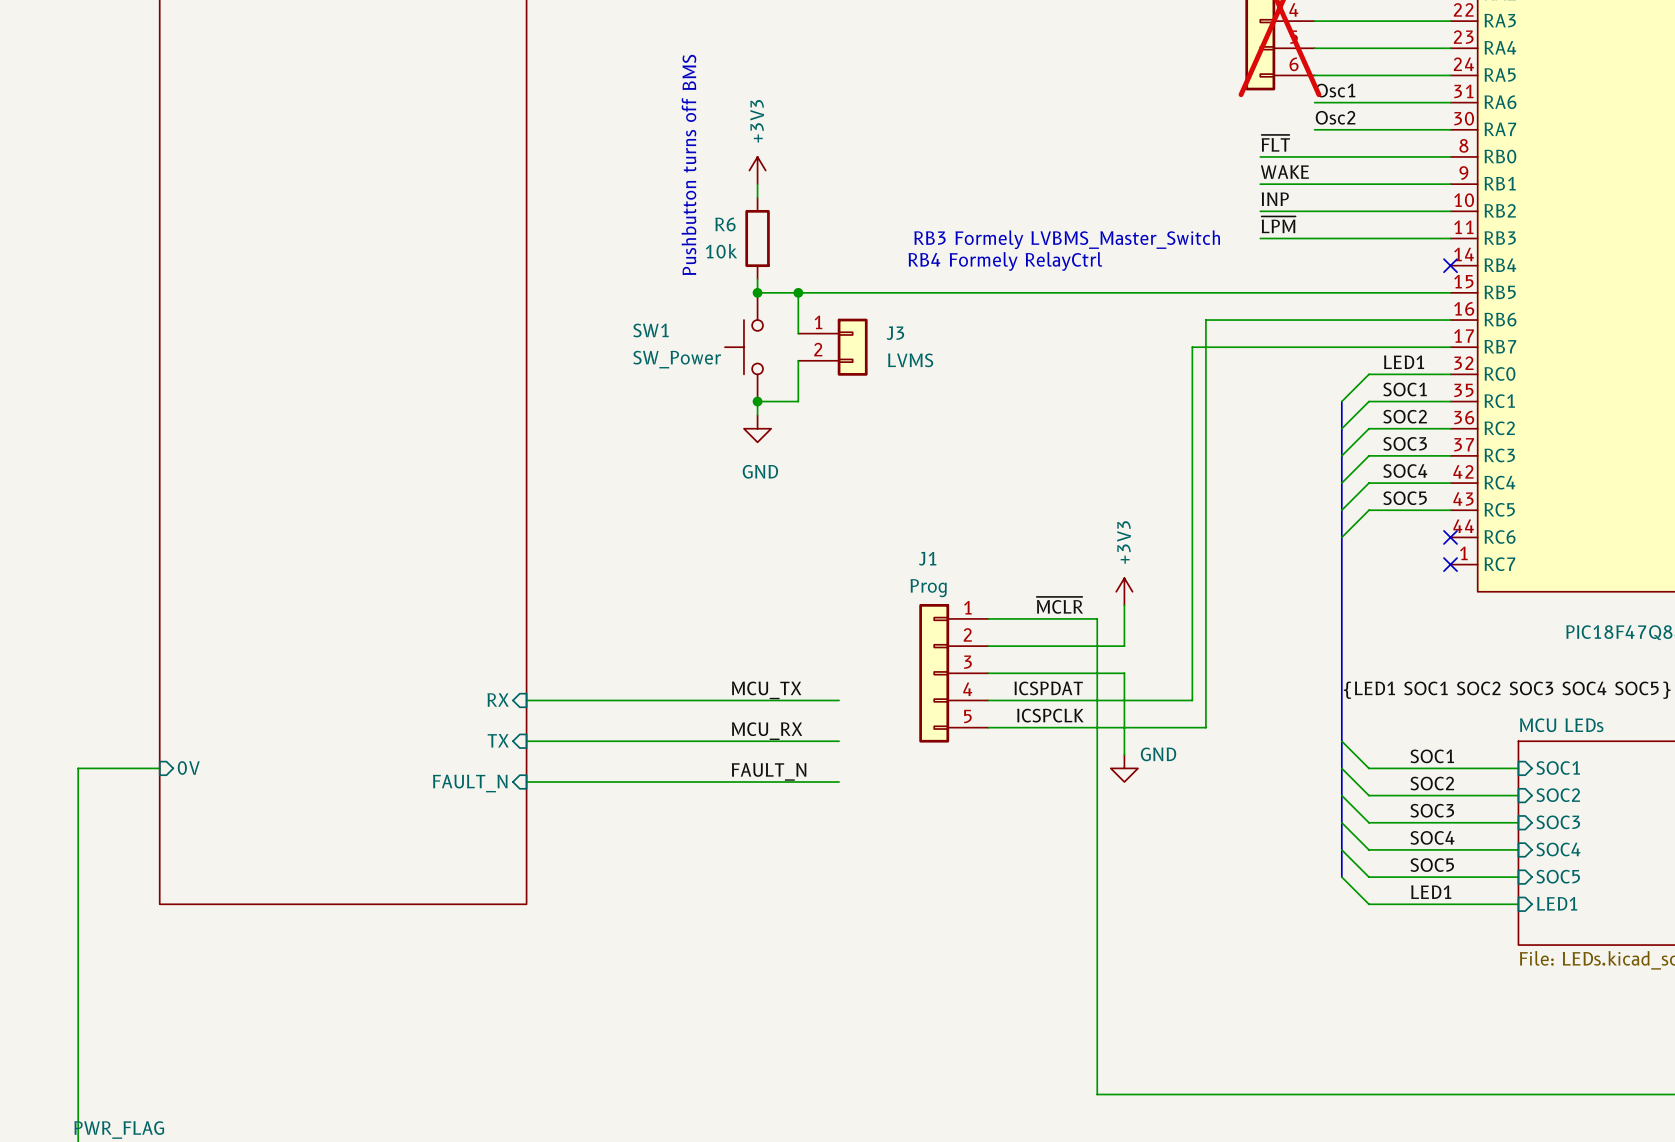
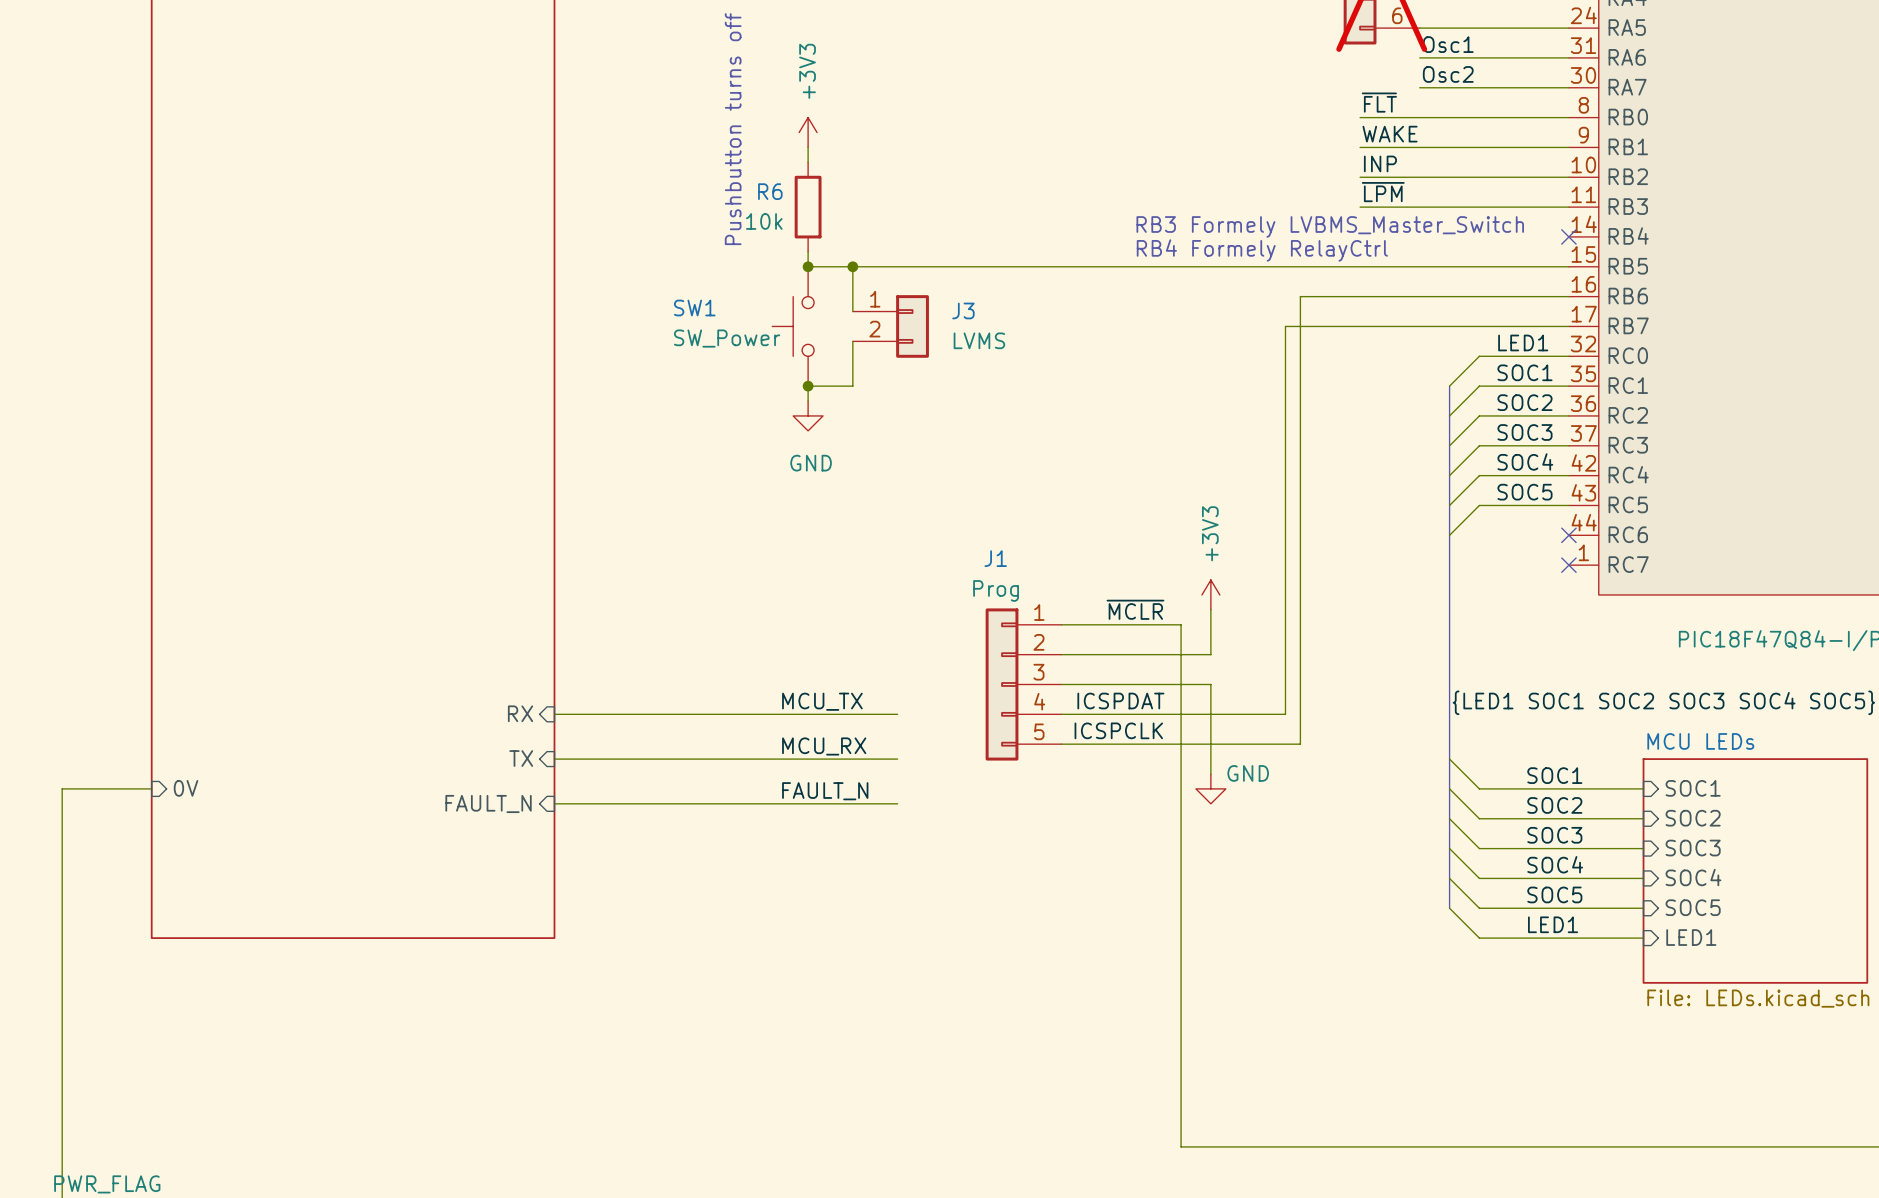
text position: RB3 Formely LVBMS_Master_Switch (1067, 239) -> RB3 Formely LVBMS_Master_Switch (1330, 226)
text position: RB4 Formely RelayCtrl (1005, 261) -> RB4 Formely RelayCtrl (1262, 250)

